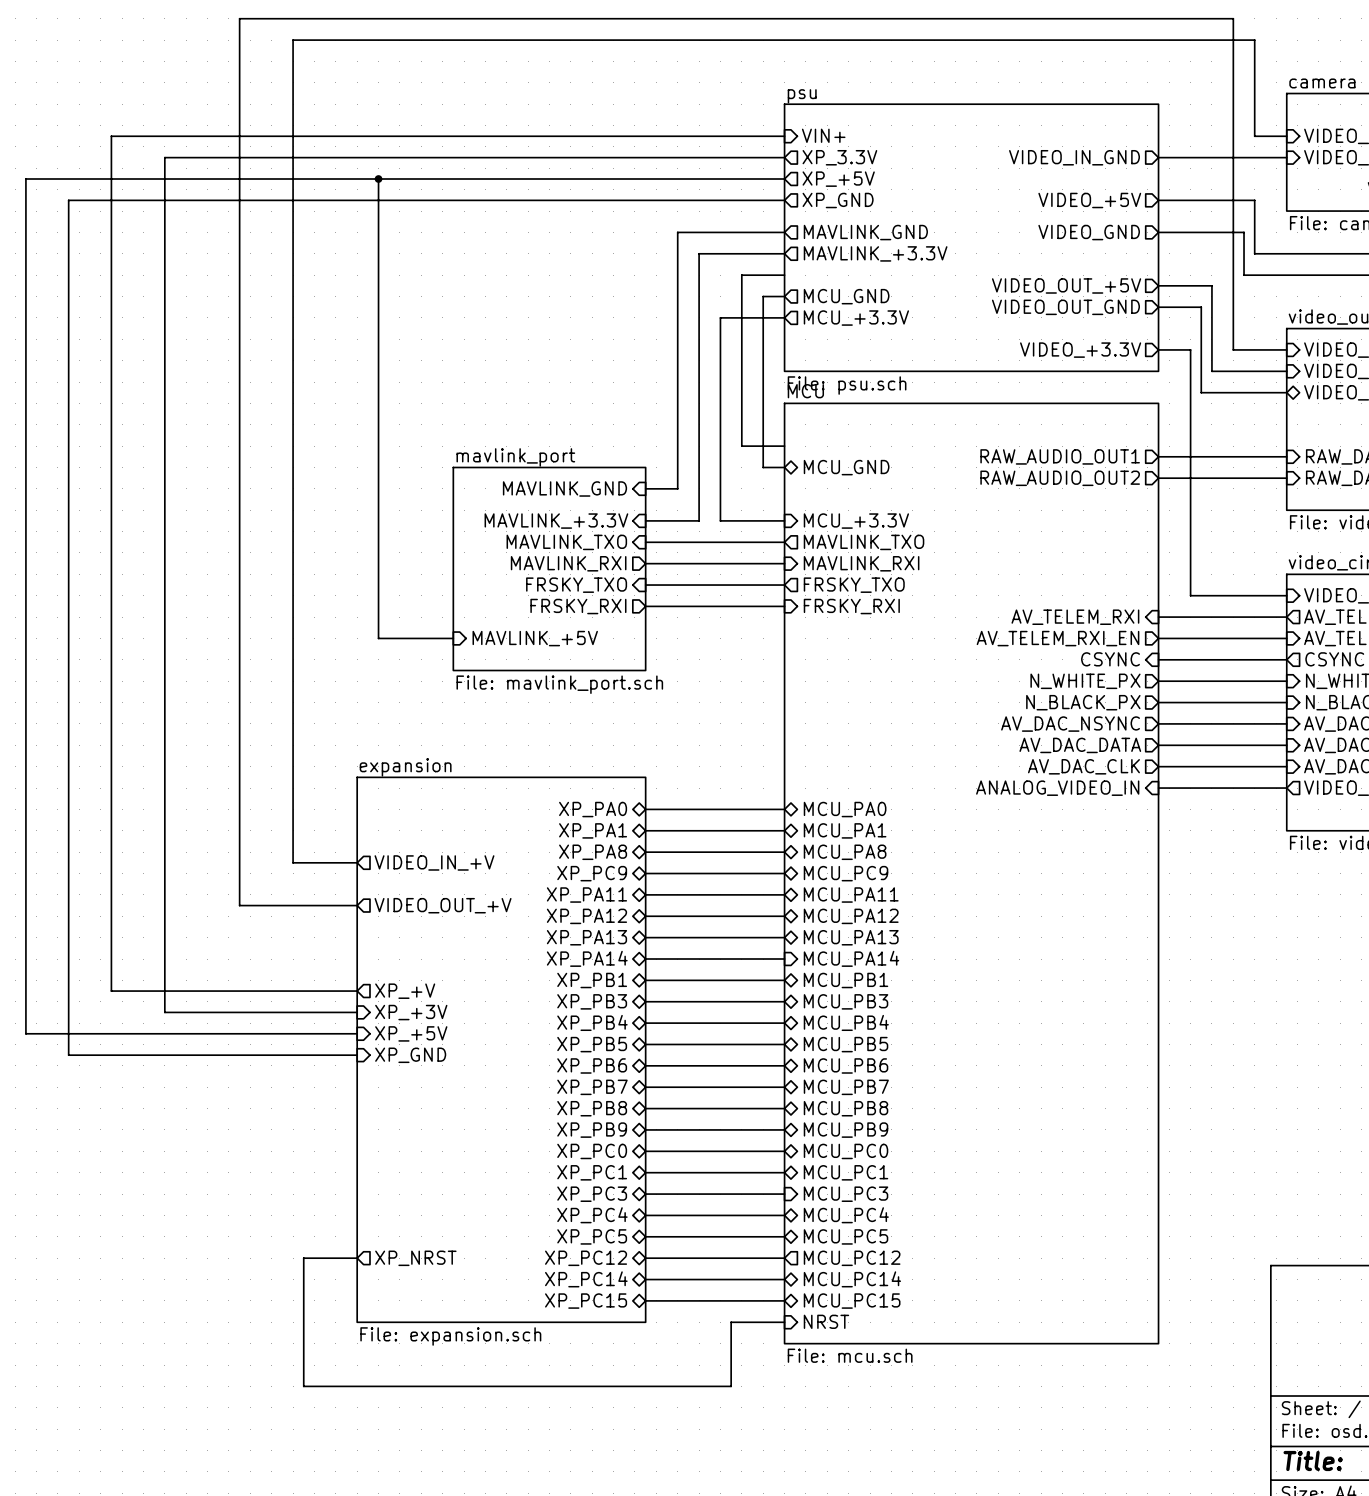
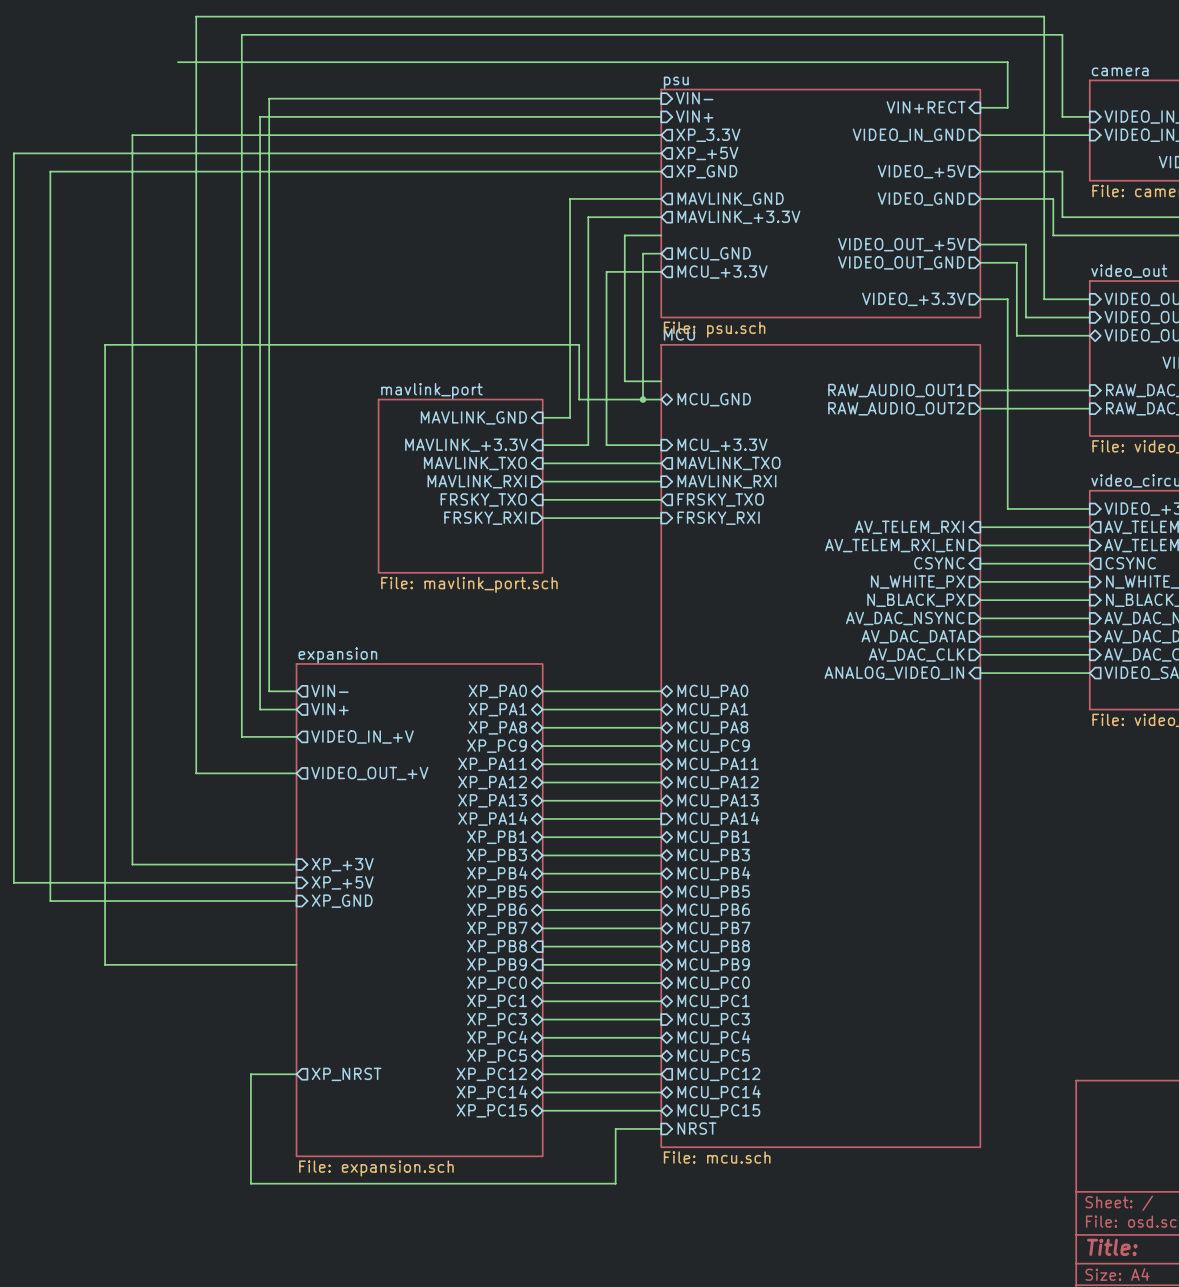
wire: none -> (178, 62) (1007, 62) (1007, 107) (980, 107)
wire: none -> (661, 98) (269, 98) (269, 691) (296, 691)
sheet pin: none -> VIN- (694, 98)
sheet pin: none -> VIN+RECT (926, 107)
wire: (314, 136) (111, 136) (111, 991) (357, 991) -> (260, 116) (260, 709) (296, 709)
wire: (378, 179) (378, 638) (453, 638) -> none
junction: (378, 179) -> none
wire: none -> (643, 399) (579, 399) (579, 344) (105, 344) (105, 964) (296, 964)
junction: none -> (643, 399)
sheet pin: MAVLINK_+5V (535, 638) -> none
sheet pin: none -> VIN- (329, 690)
sheet pin: none -> VIN+ (329, 709)
sheet pin: XP_+V (405, 991) -> none
sheet expansion: File: expansion.sch (501, 1049) -> none
sheet expansion: none -> File: expansion.sch (419, 910)
sheet pin shape: bidirectional (592, 1108) -> input (497, 946)
sheet pin shape: bidirectional (592, 1130) -> input (497, 964)

